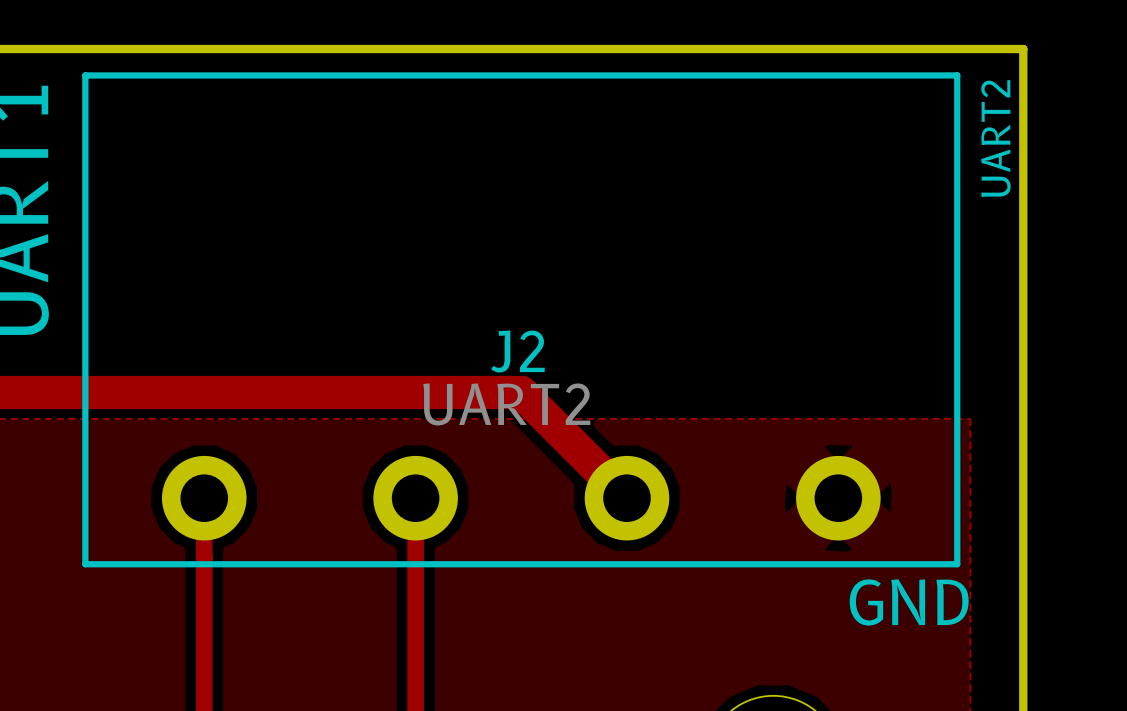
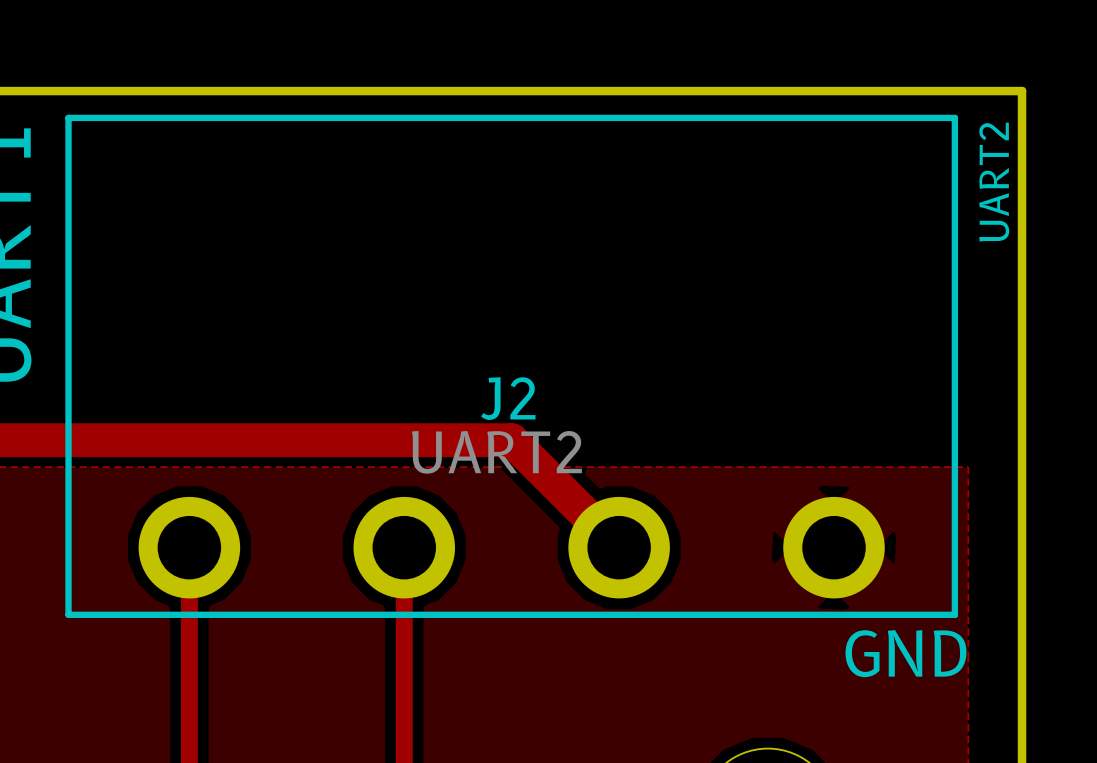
J2 footprint: [82, 72, 961, 568] -> [65, 114, 959, 618]

